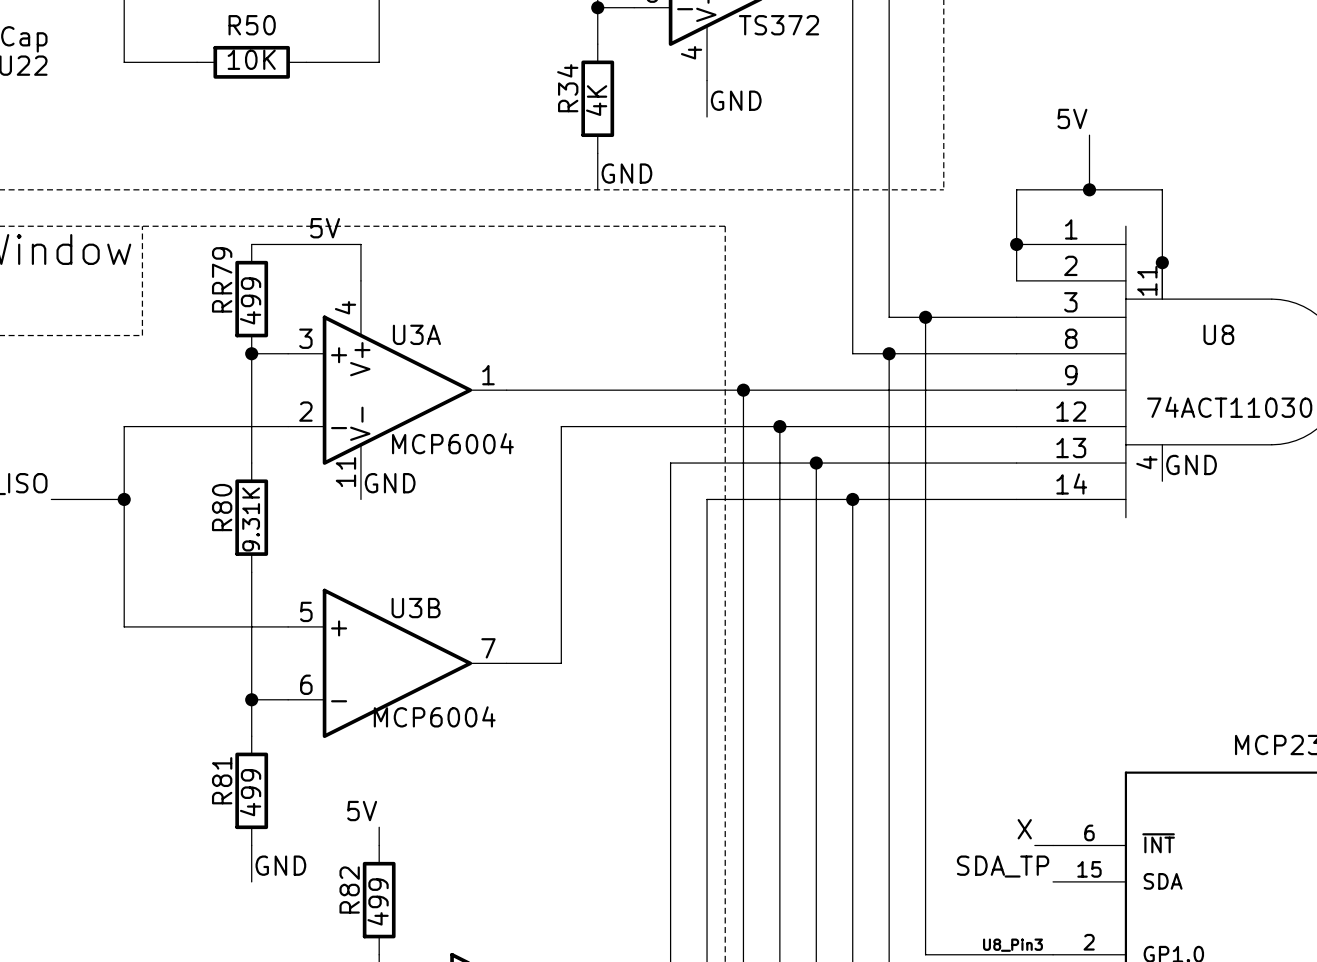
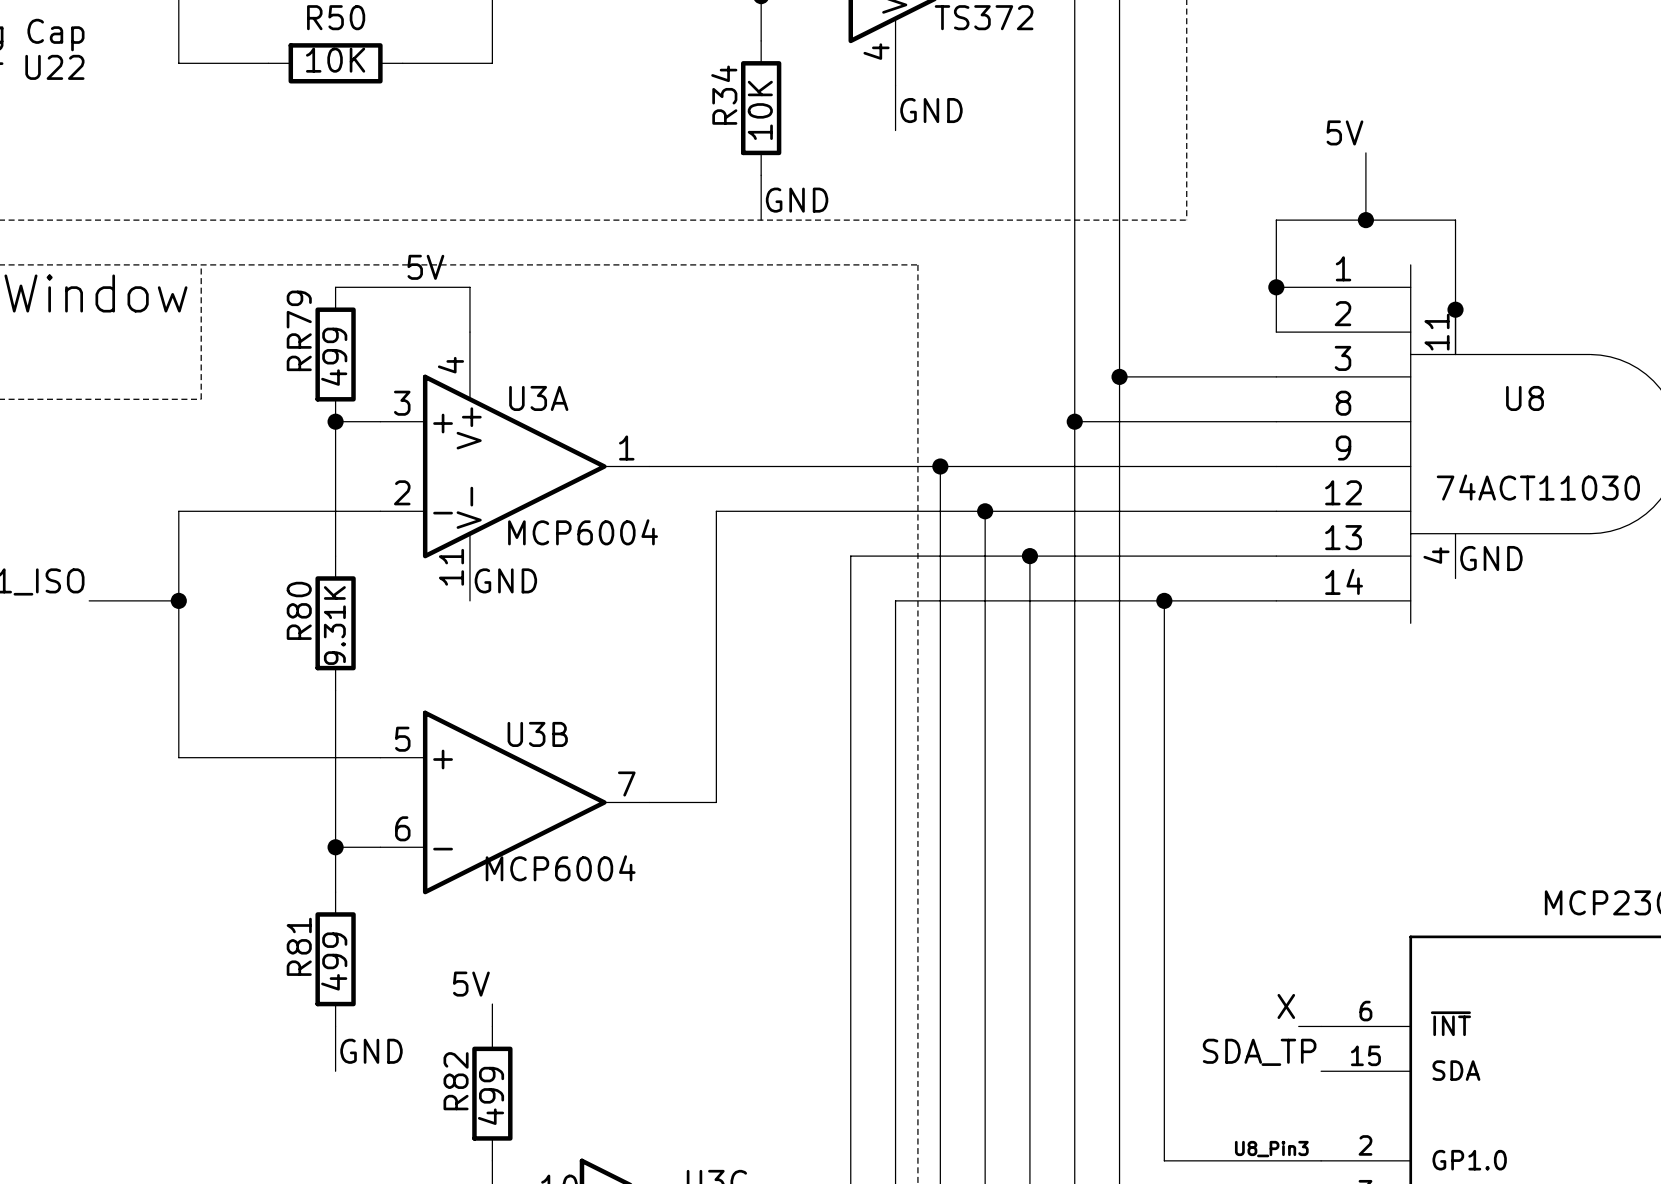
R34 value: 4K (596, 100) -> 10K (760, 110)
wire: none -> (1119, 376) (1119, 421)
junction: none -> (1119, 376)
wire: (925, 317) (925, 499) -> none
junction: (925, 317) -> none
wire: none -> (1074, 421) (1074, 600)
junction: none -> (1074, 421)
junction: (889, 353) -> none
junction: (852, 499) -> none
junction: none -> (1164, 600)

